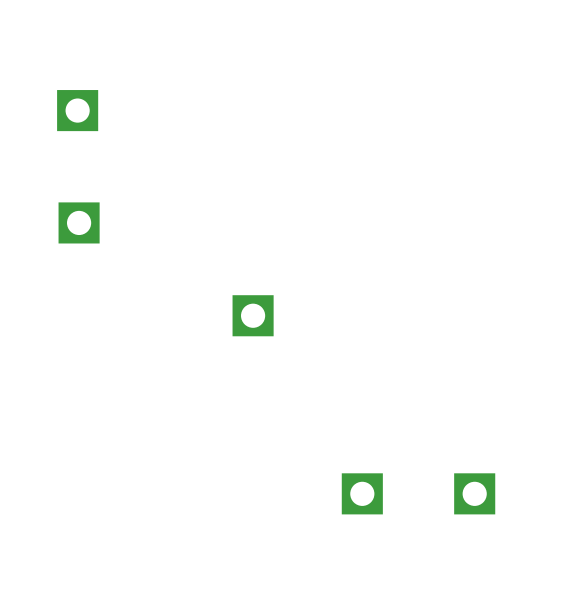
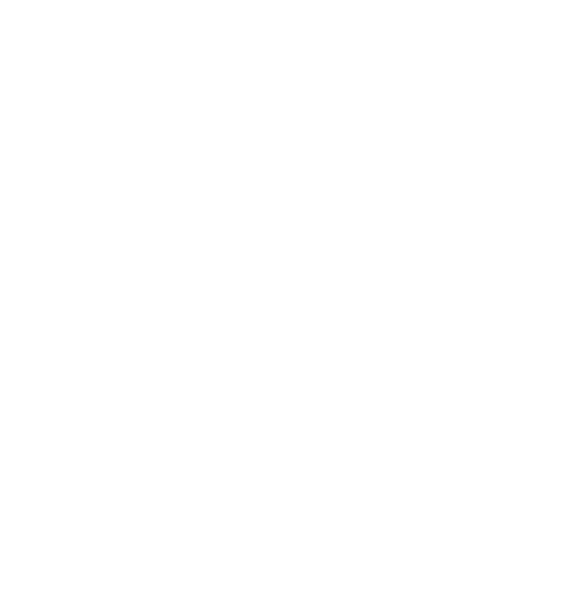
part: (77, 110) -> none
part: (79, 222) -> none
part: (253, 315) -> none
part: (362, 493) -> none
part: (474, 493) -> none

